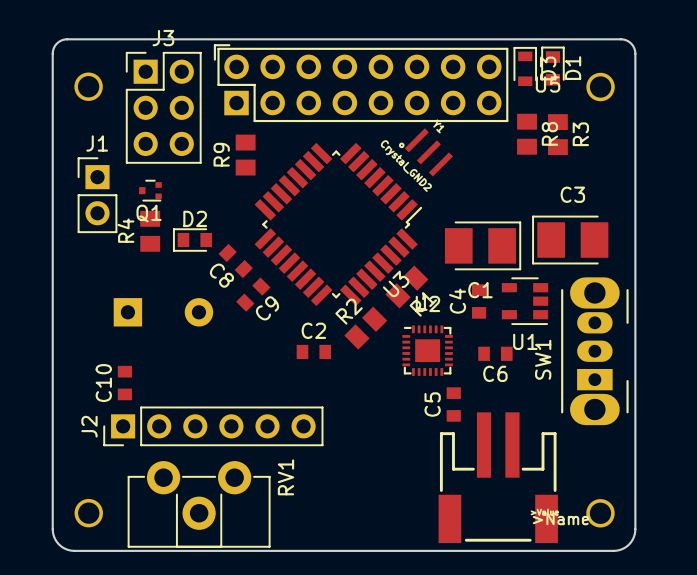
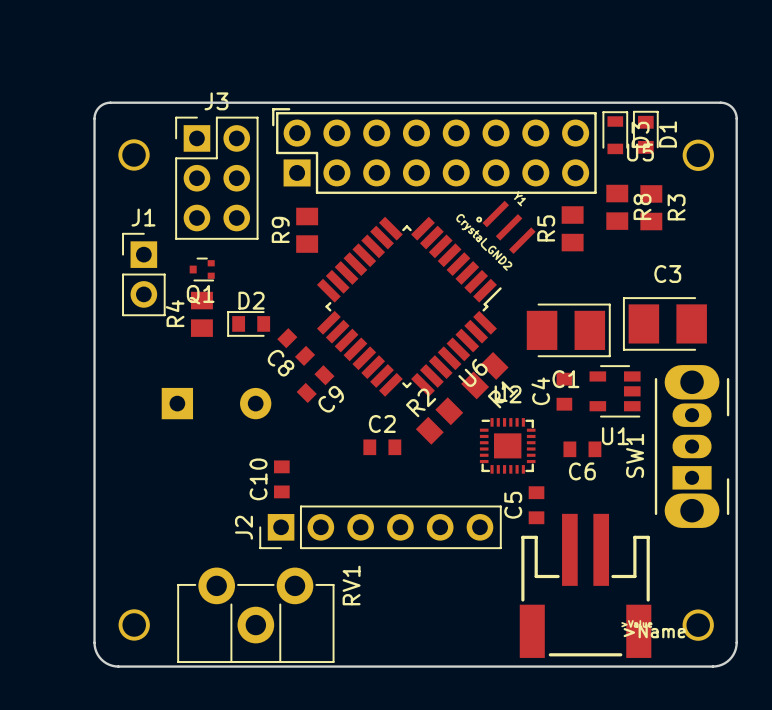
R5: none -> (572, 228)
U3 name: U3 (396, 283) -> U6 (473, 372)
C10 position: (124, 383) -> (281, 479)
J2 position: (213, 426) -> (380, 527)

